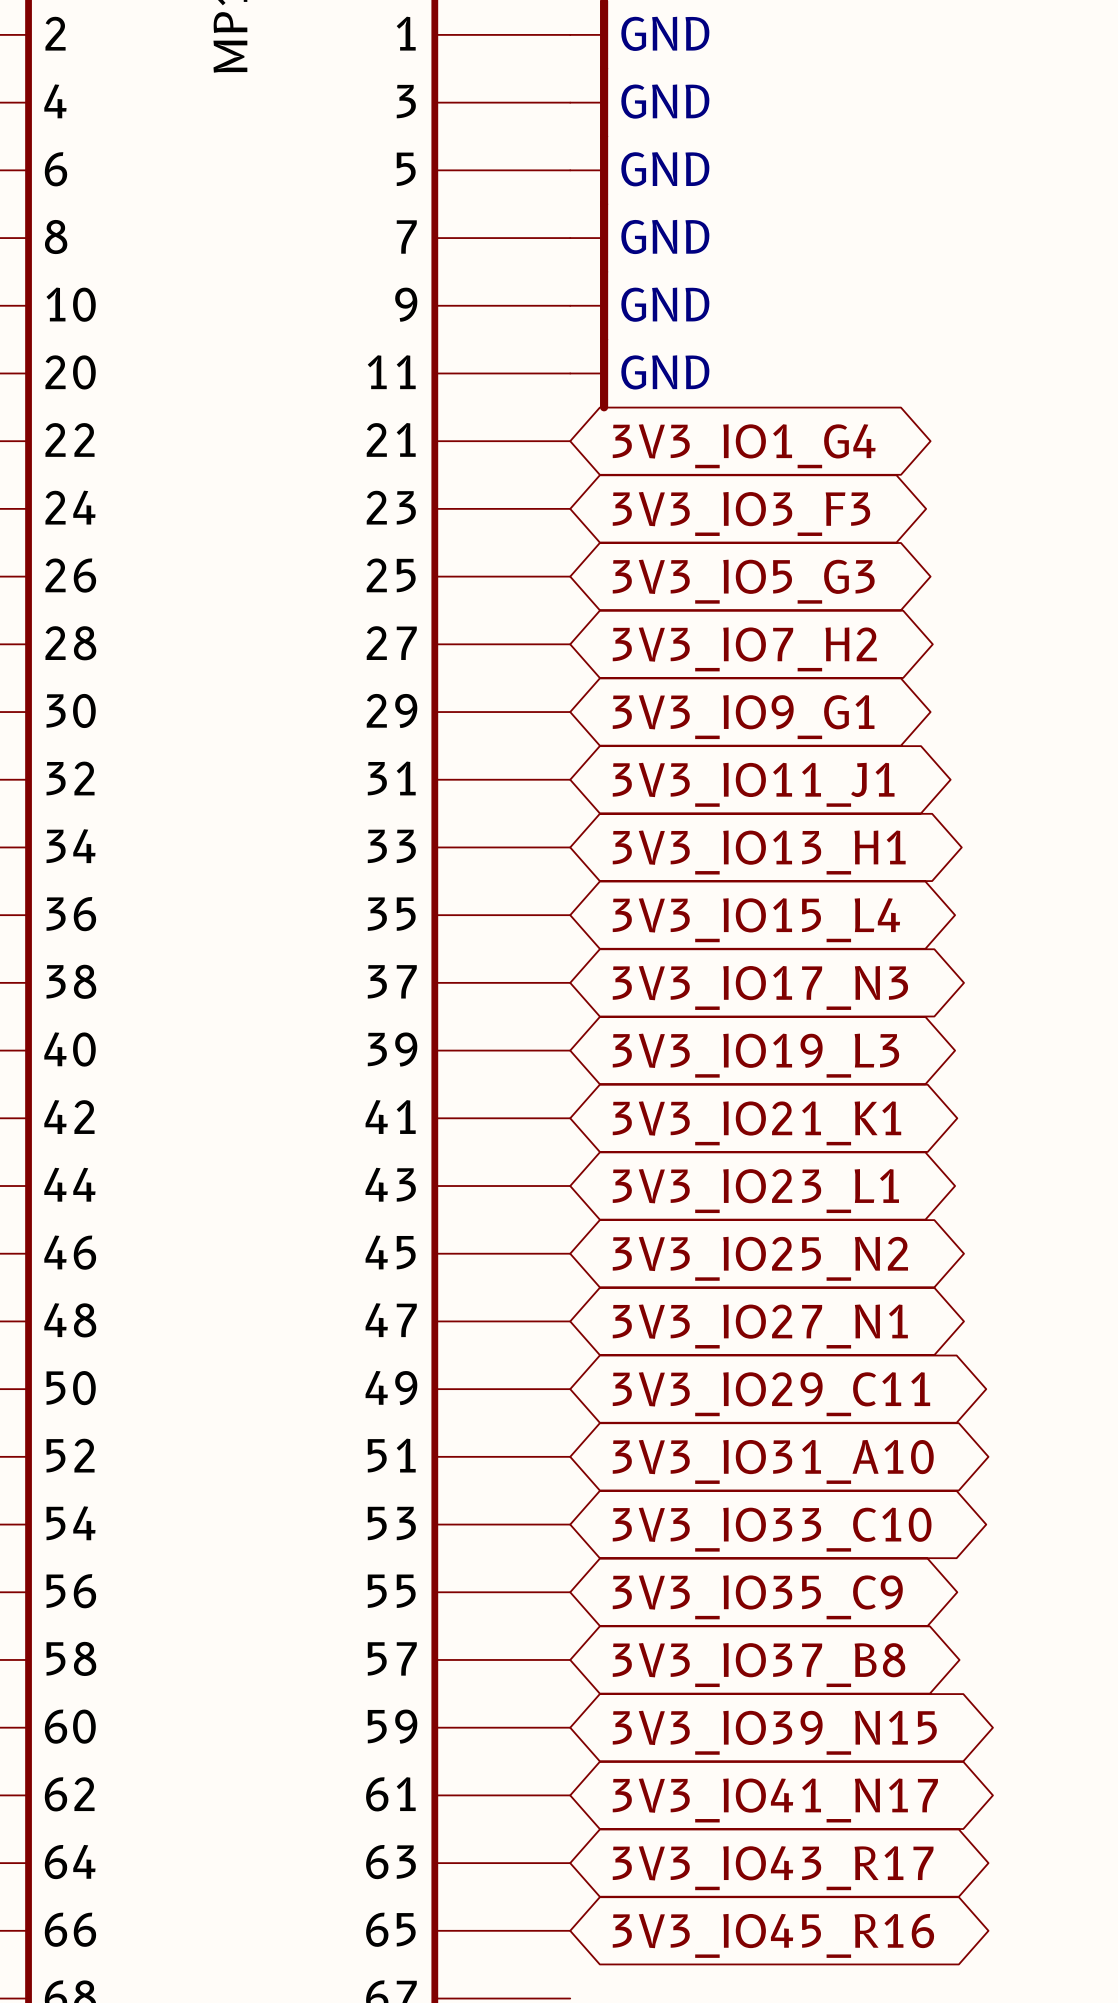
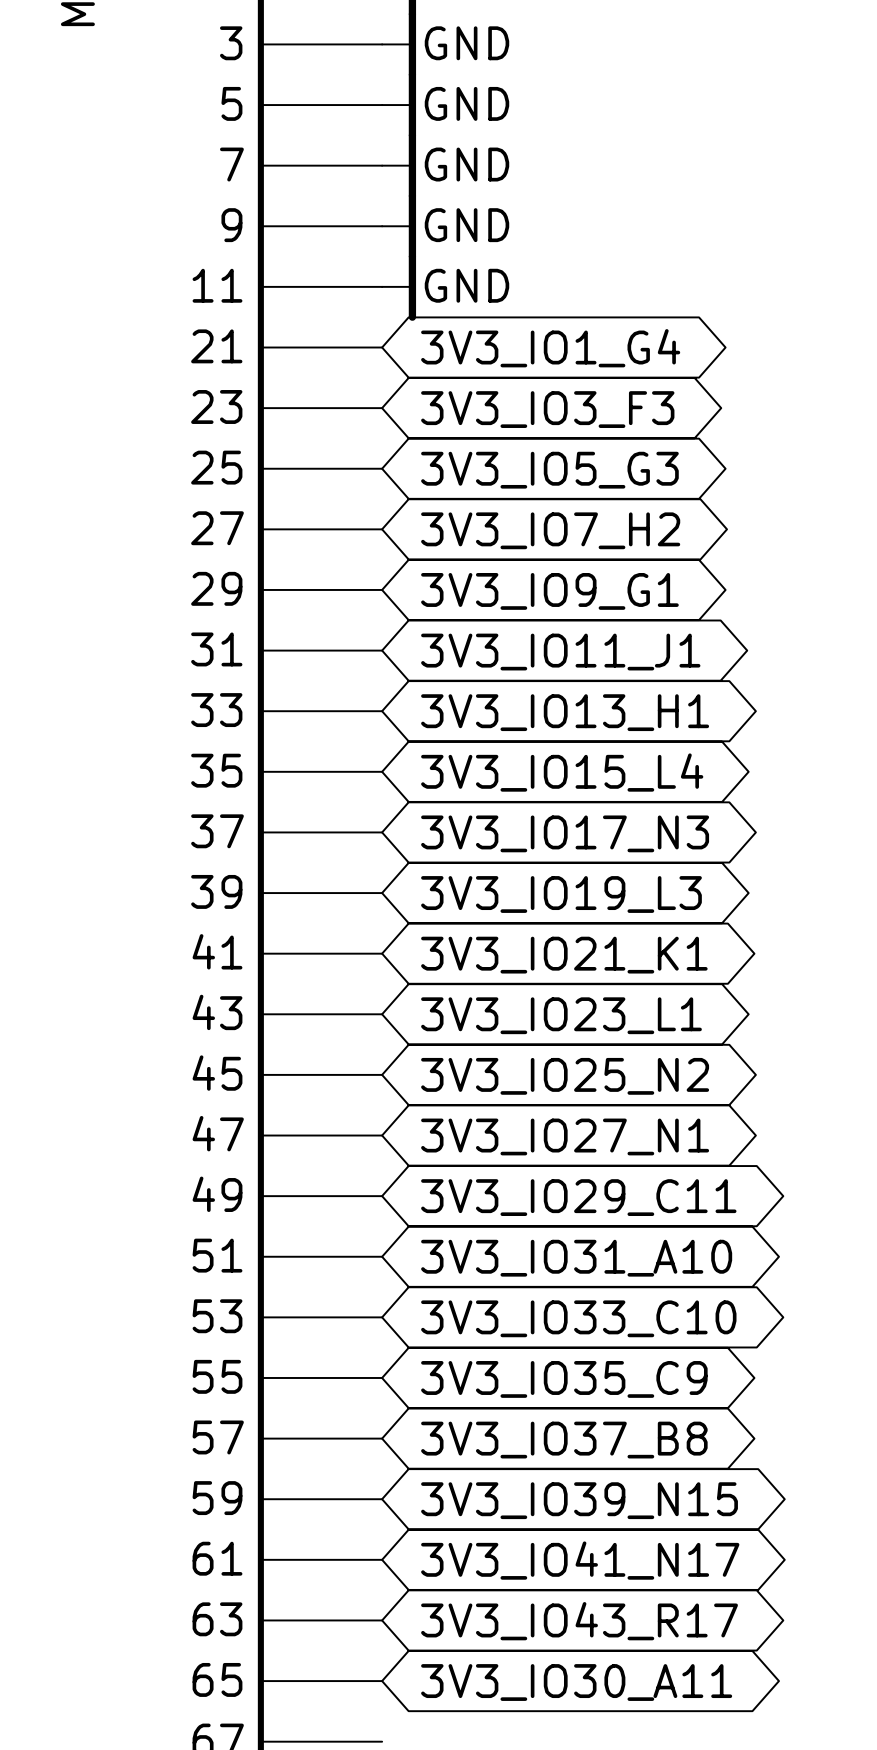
global label: 3V3_IO45_R16 (773, 1935) -> 3V3_IO30_A11 (576, 1682)

